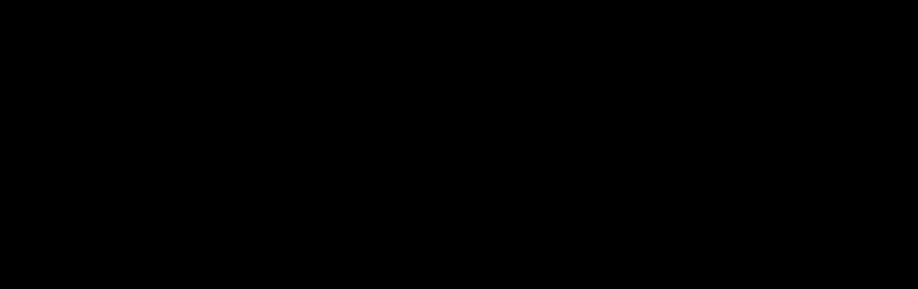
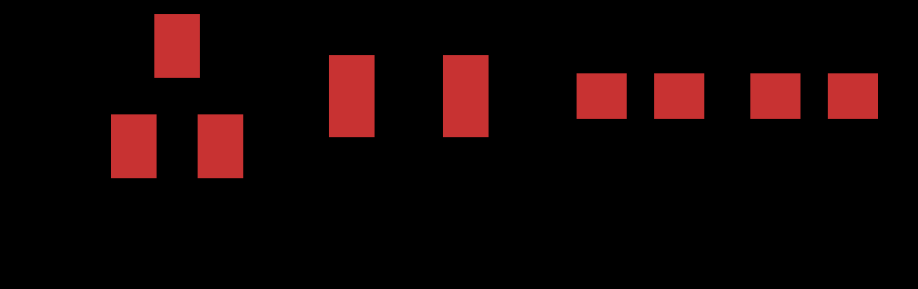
part: none -> (177, 96)
part: none -> (408, 96)
part: none -> (640, 96)
part: none -> (814, 96)

